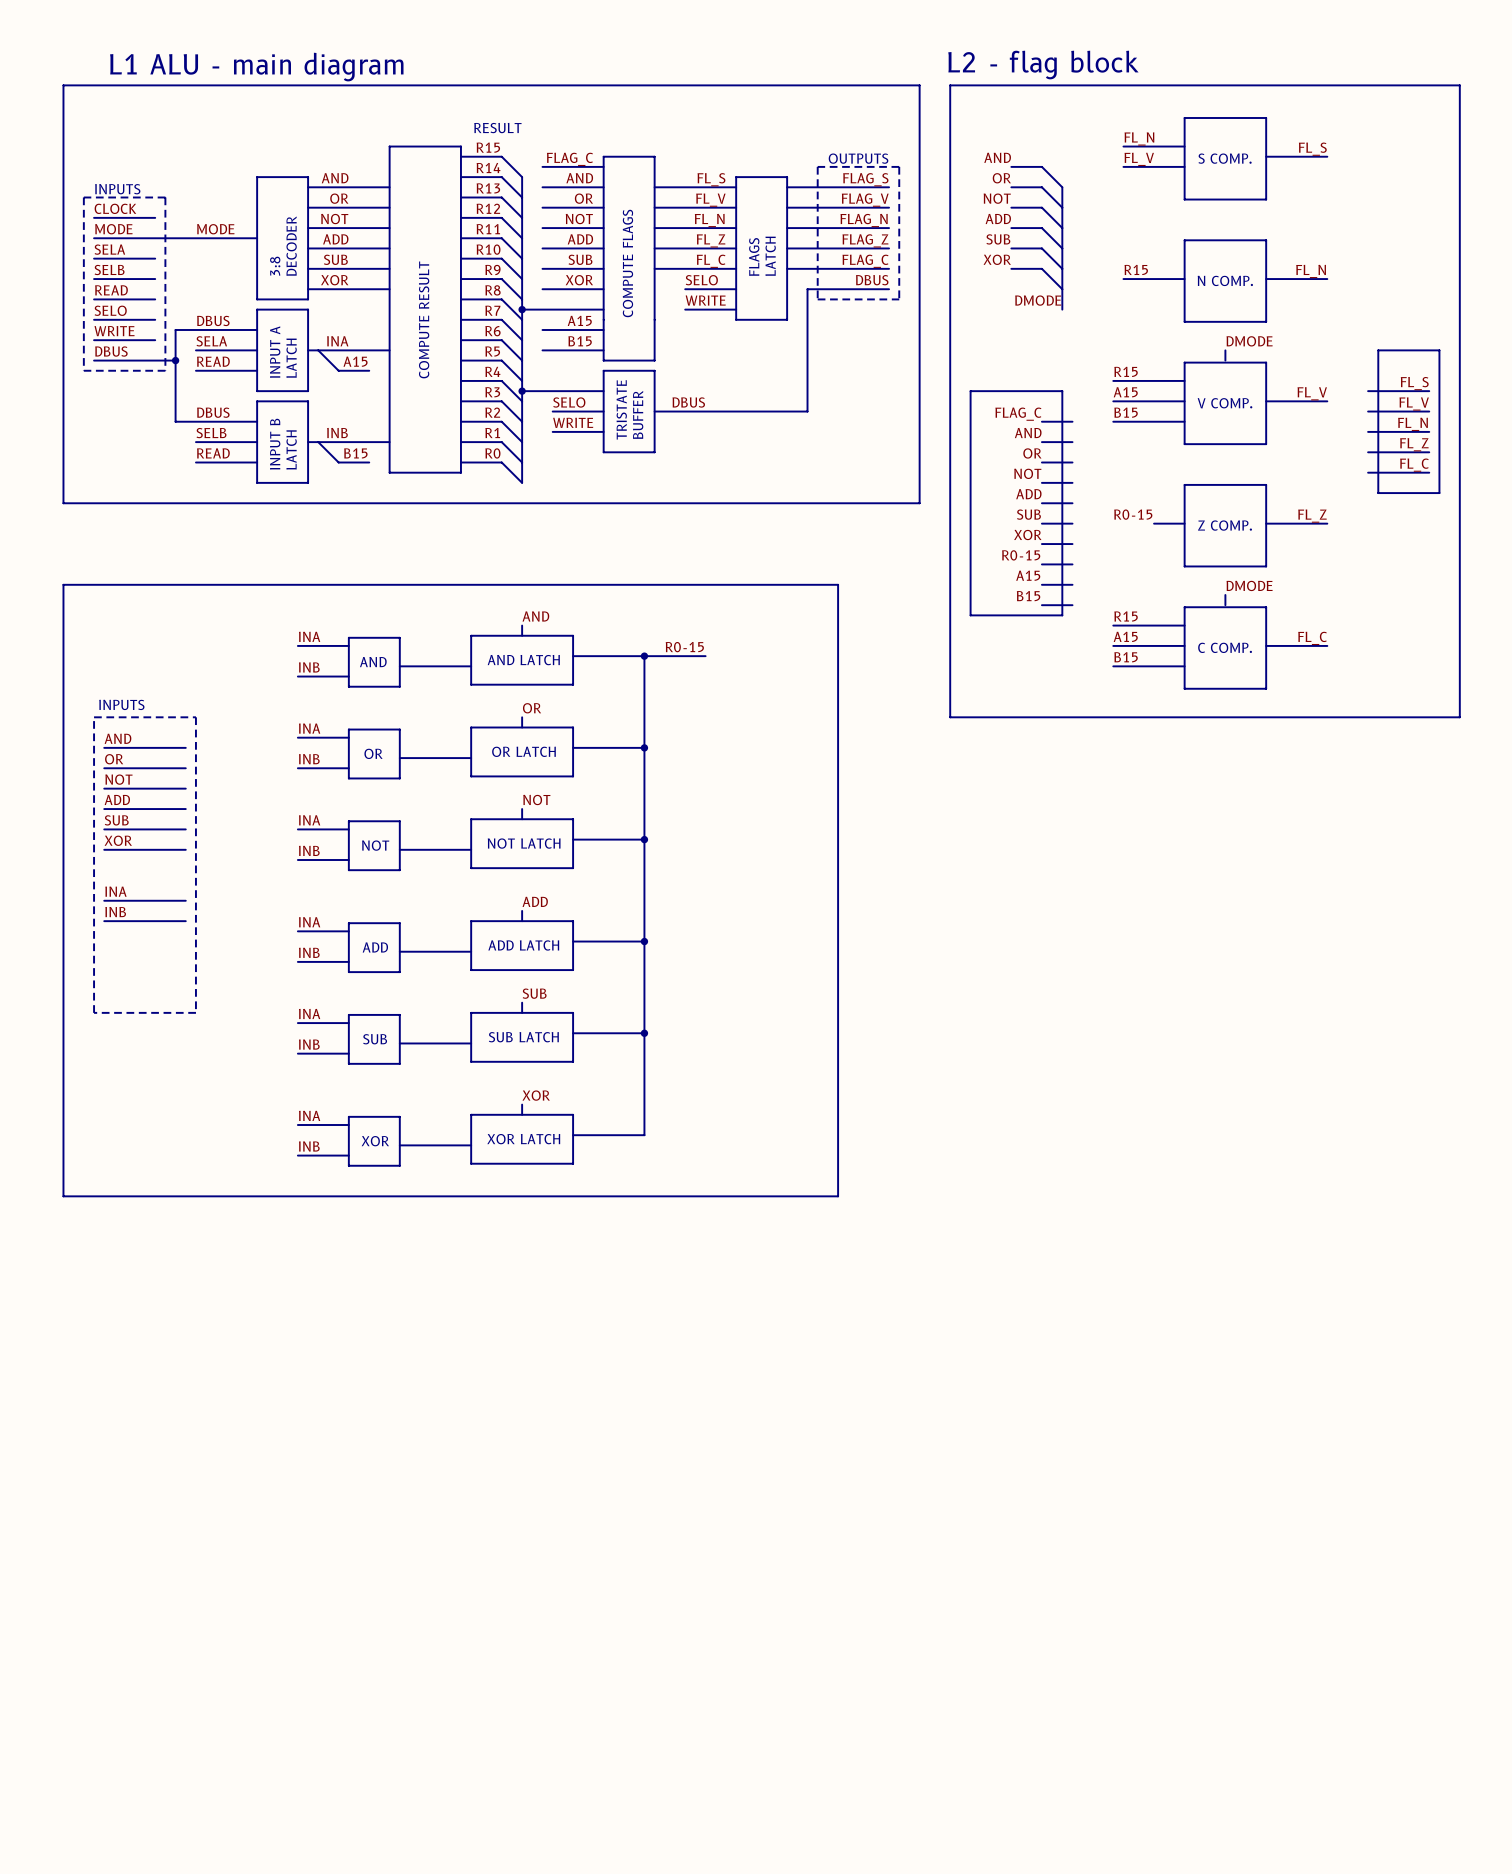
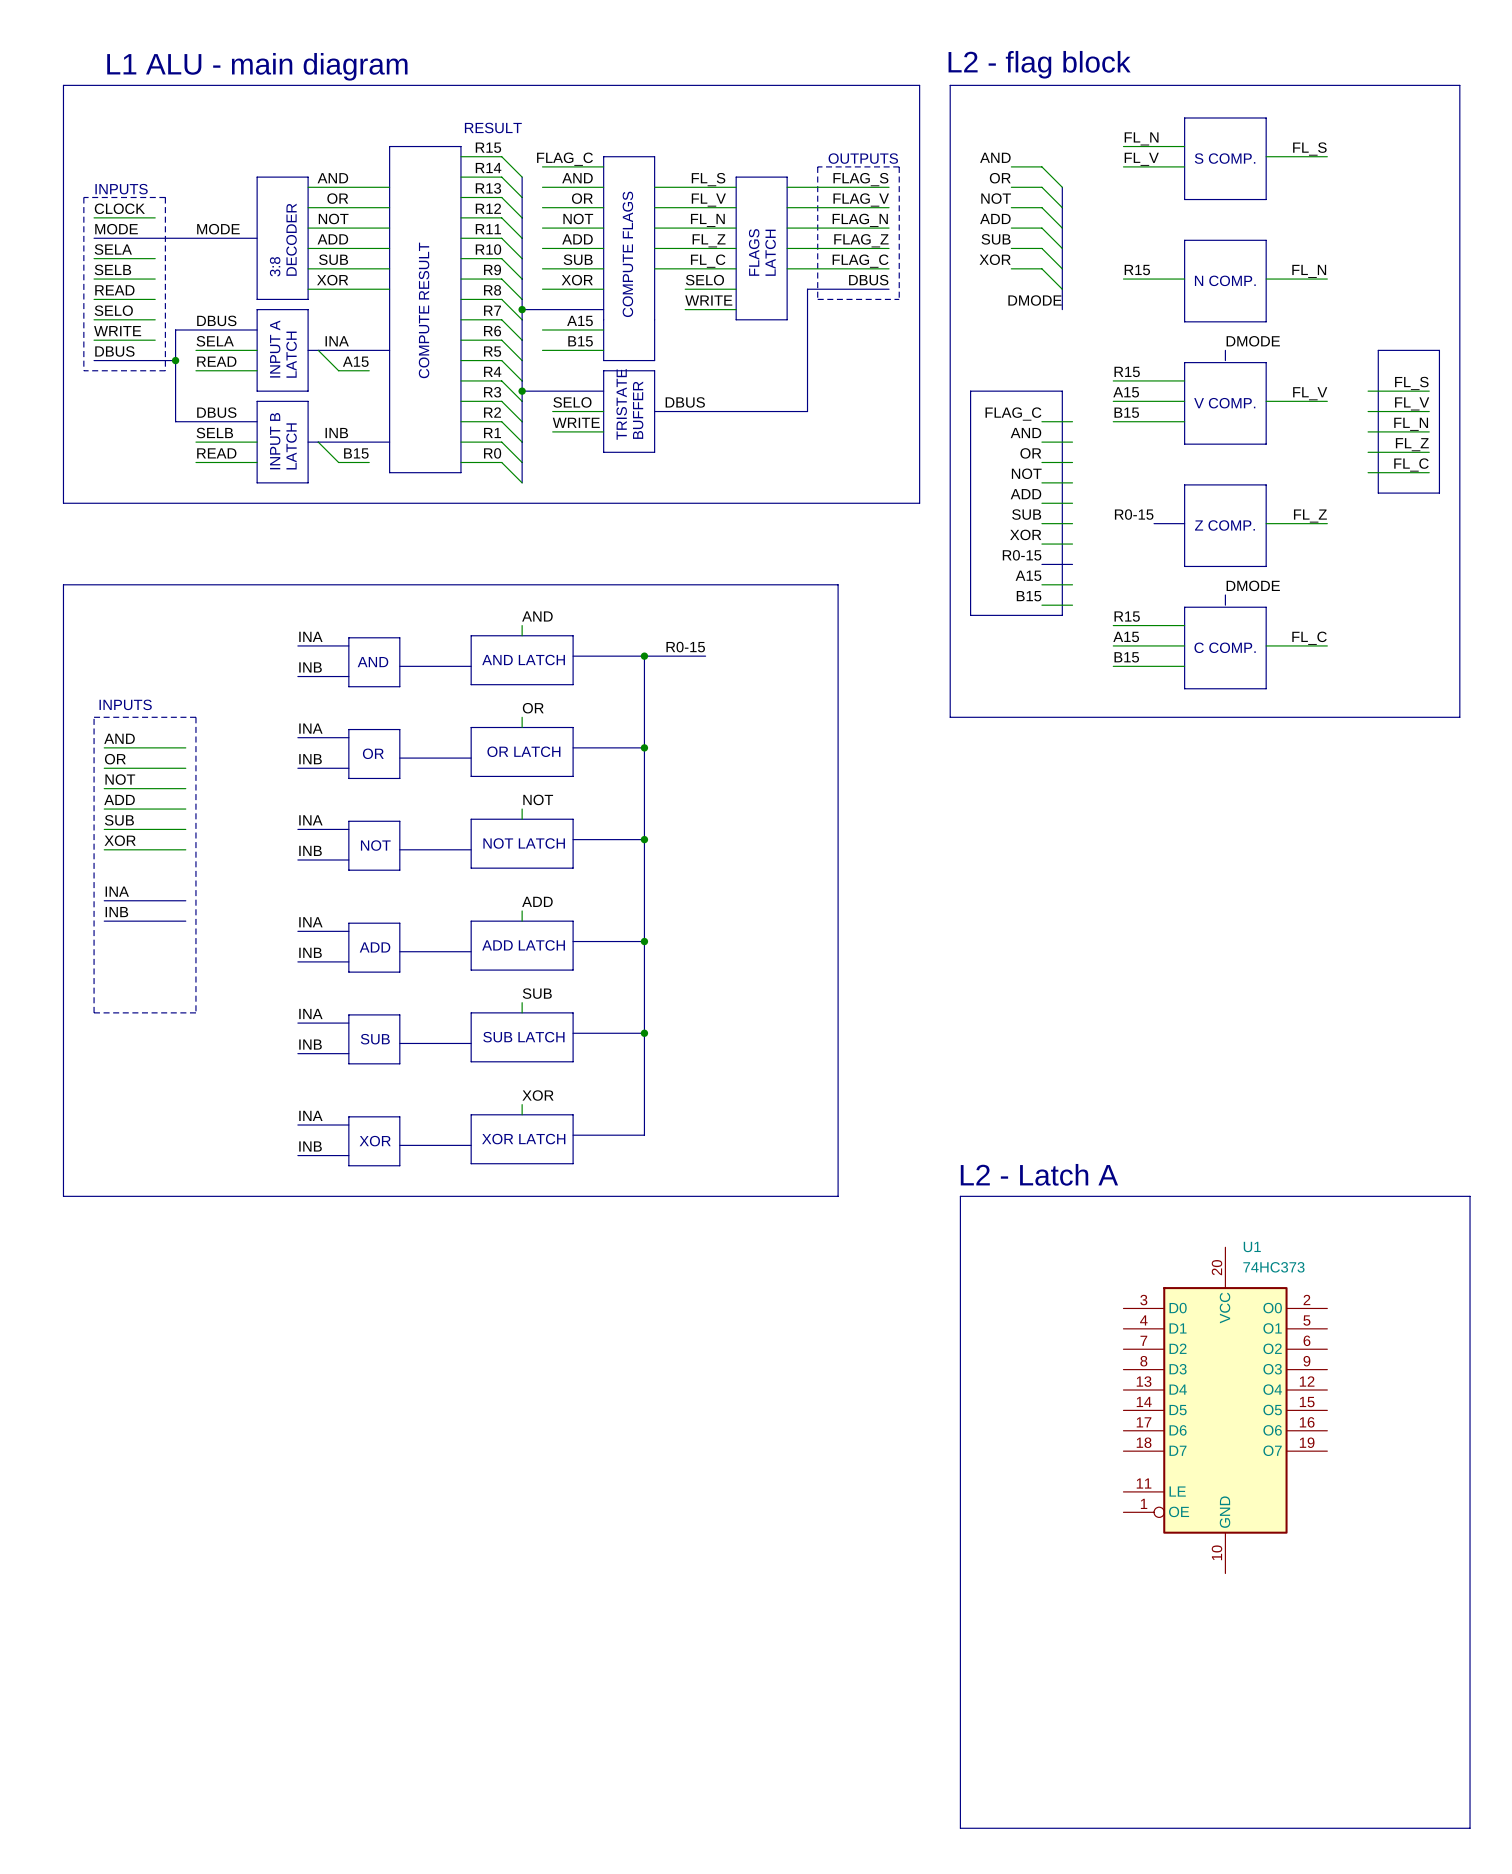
text: none -> L2 - Latch A (1039, 1174)
line: none -> (960, 1196) (1470, 1196) (1470, 1828) (960, 1828) (960, 1196)
U1: none -> 74HC373 (1225, 1410)

